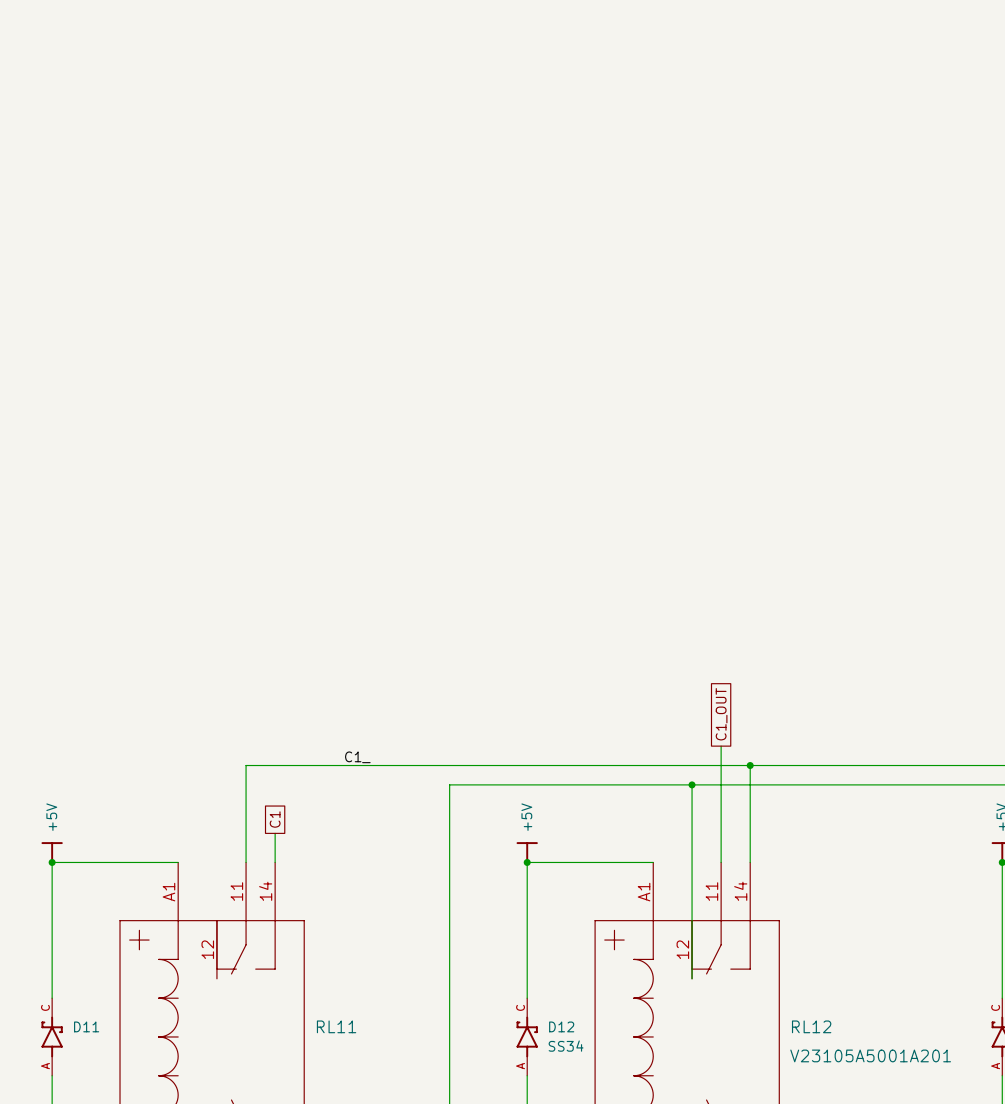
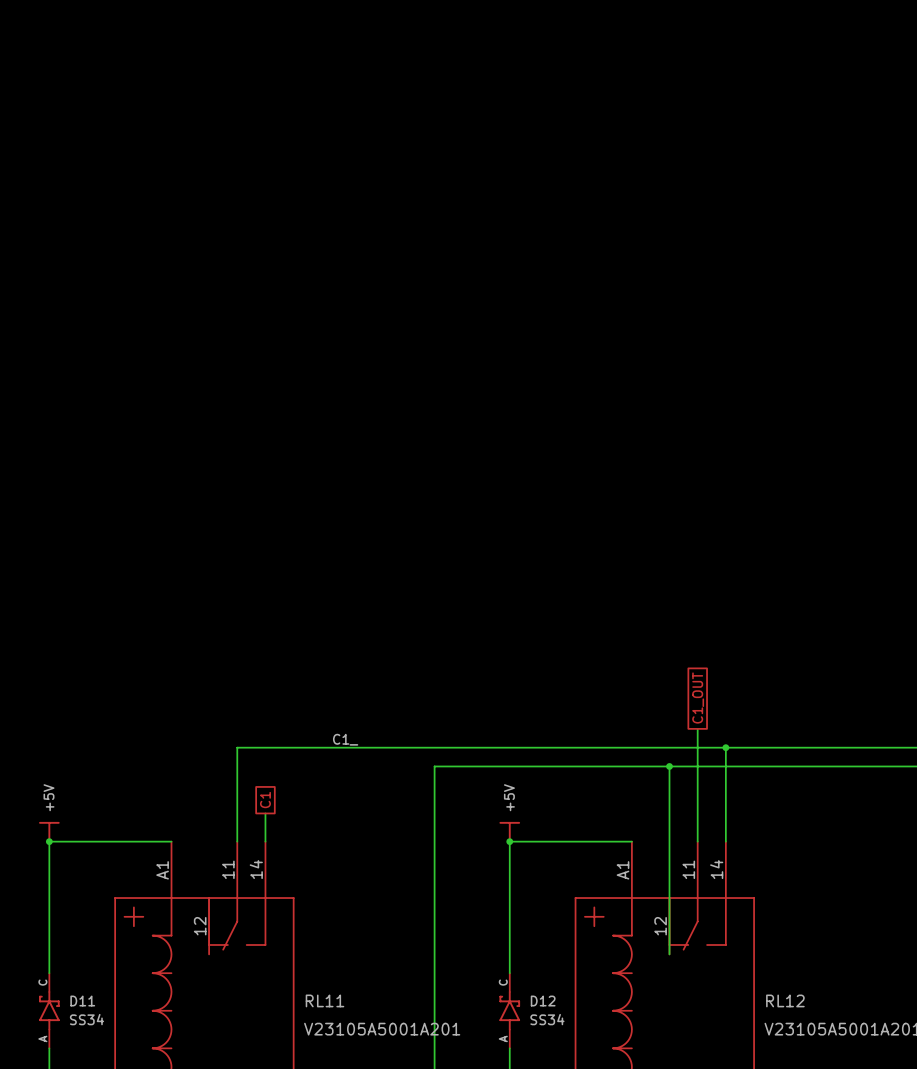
D11 value: none -> SS34 (87, 1019)
RL11 value: none -> V23105A5001A201 (382, 1029)

